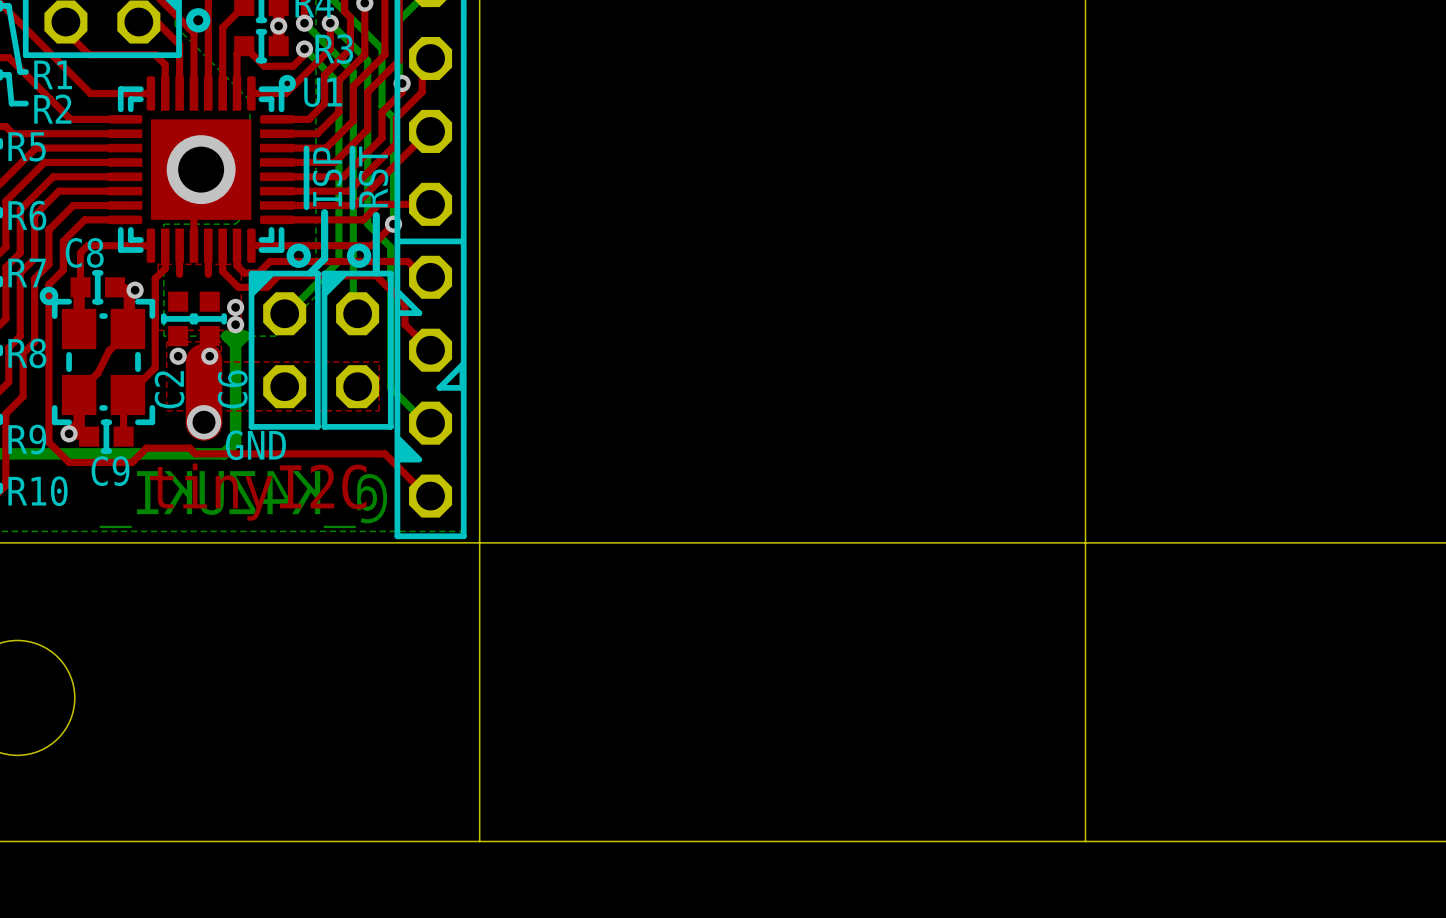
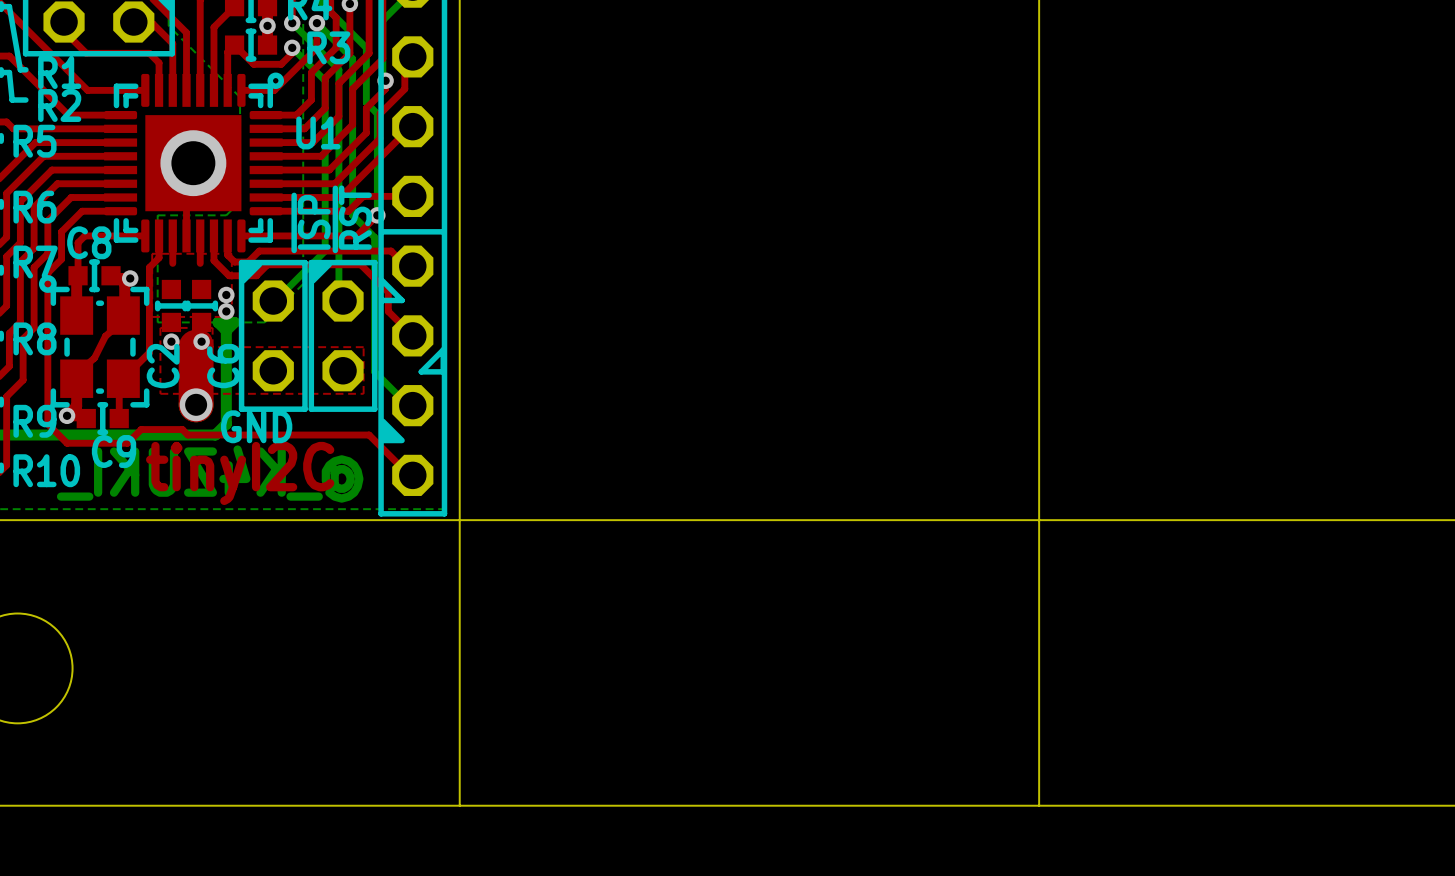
drawing: [186, 8, 211, 33] -> none
U1 name position: U1 (323, 92) -> U1 (318, 132)
text position: ~{RST} (370, 176) -> ~{RST} (352, 219)
text position: ~{ISP} (324, 177) -> ~{ISP} (311, 222)
line: (324, 212) (324, 258) (310, 272) -> none
line: (376, 215) (376, 272) -> none
drawing: [286, 243, 311, 268] -> none
drawing: [346, 243, 372, 268] -> none

